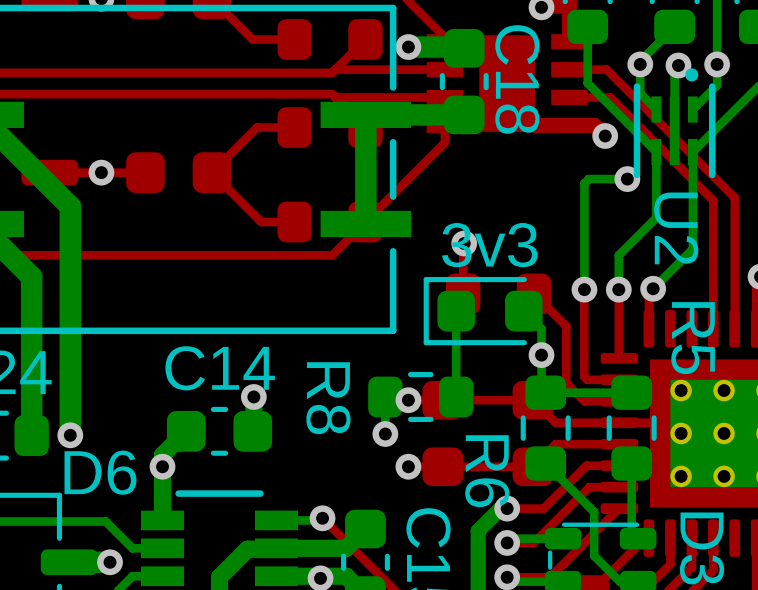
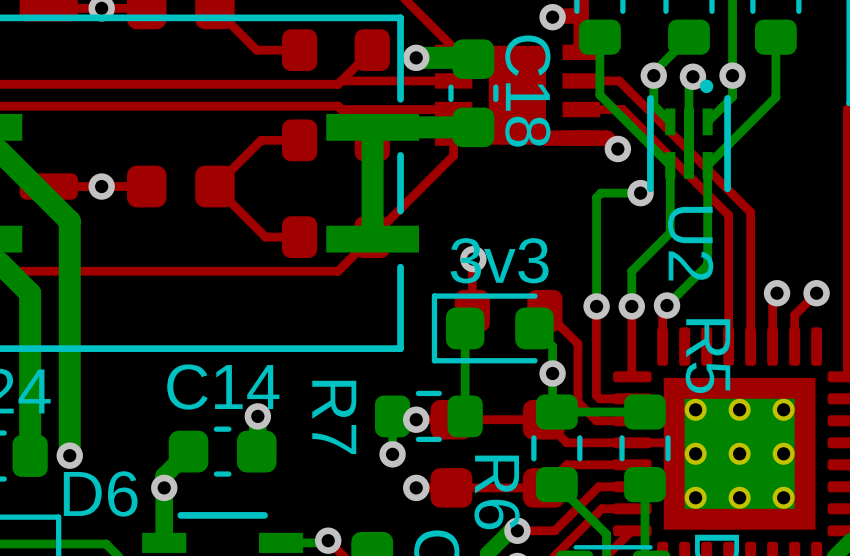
R8 name: R8 (328, 398) -> R7 (334, 417)

